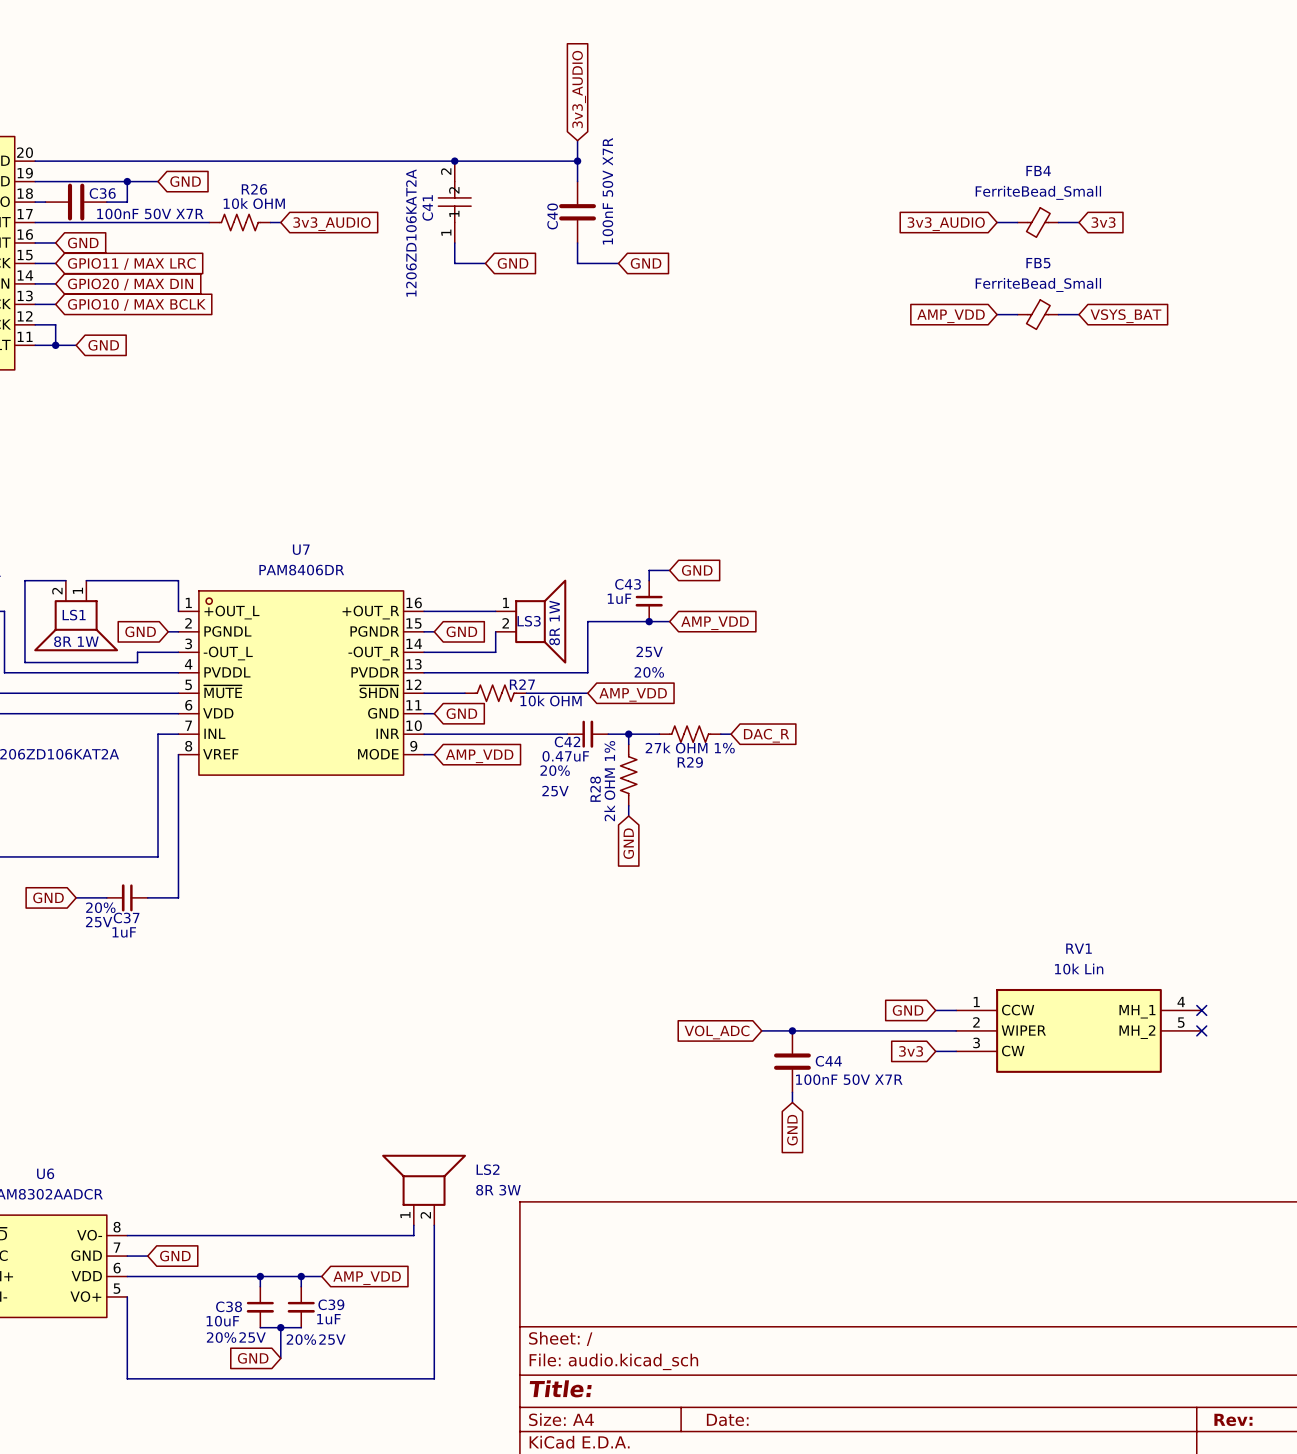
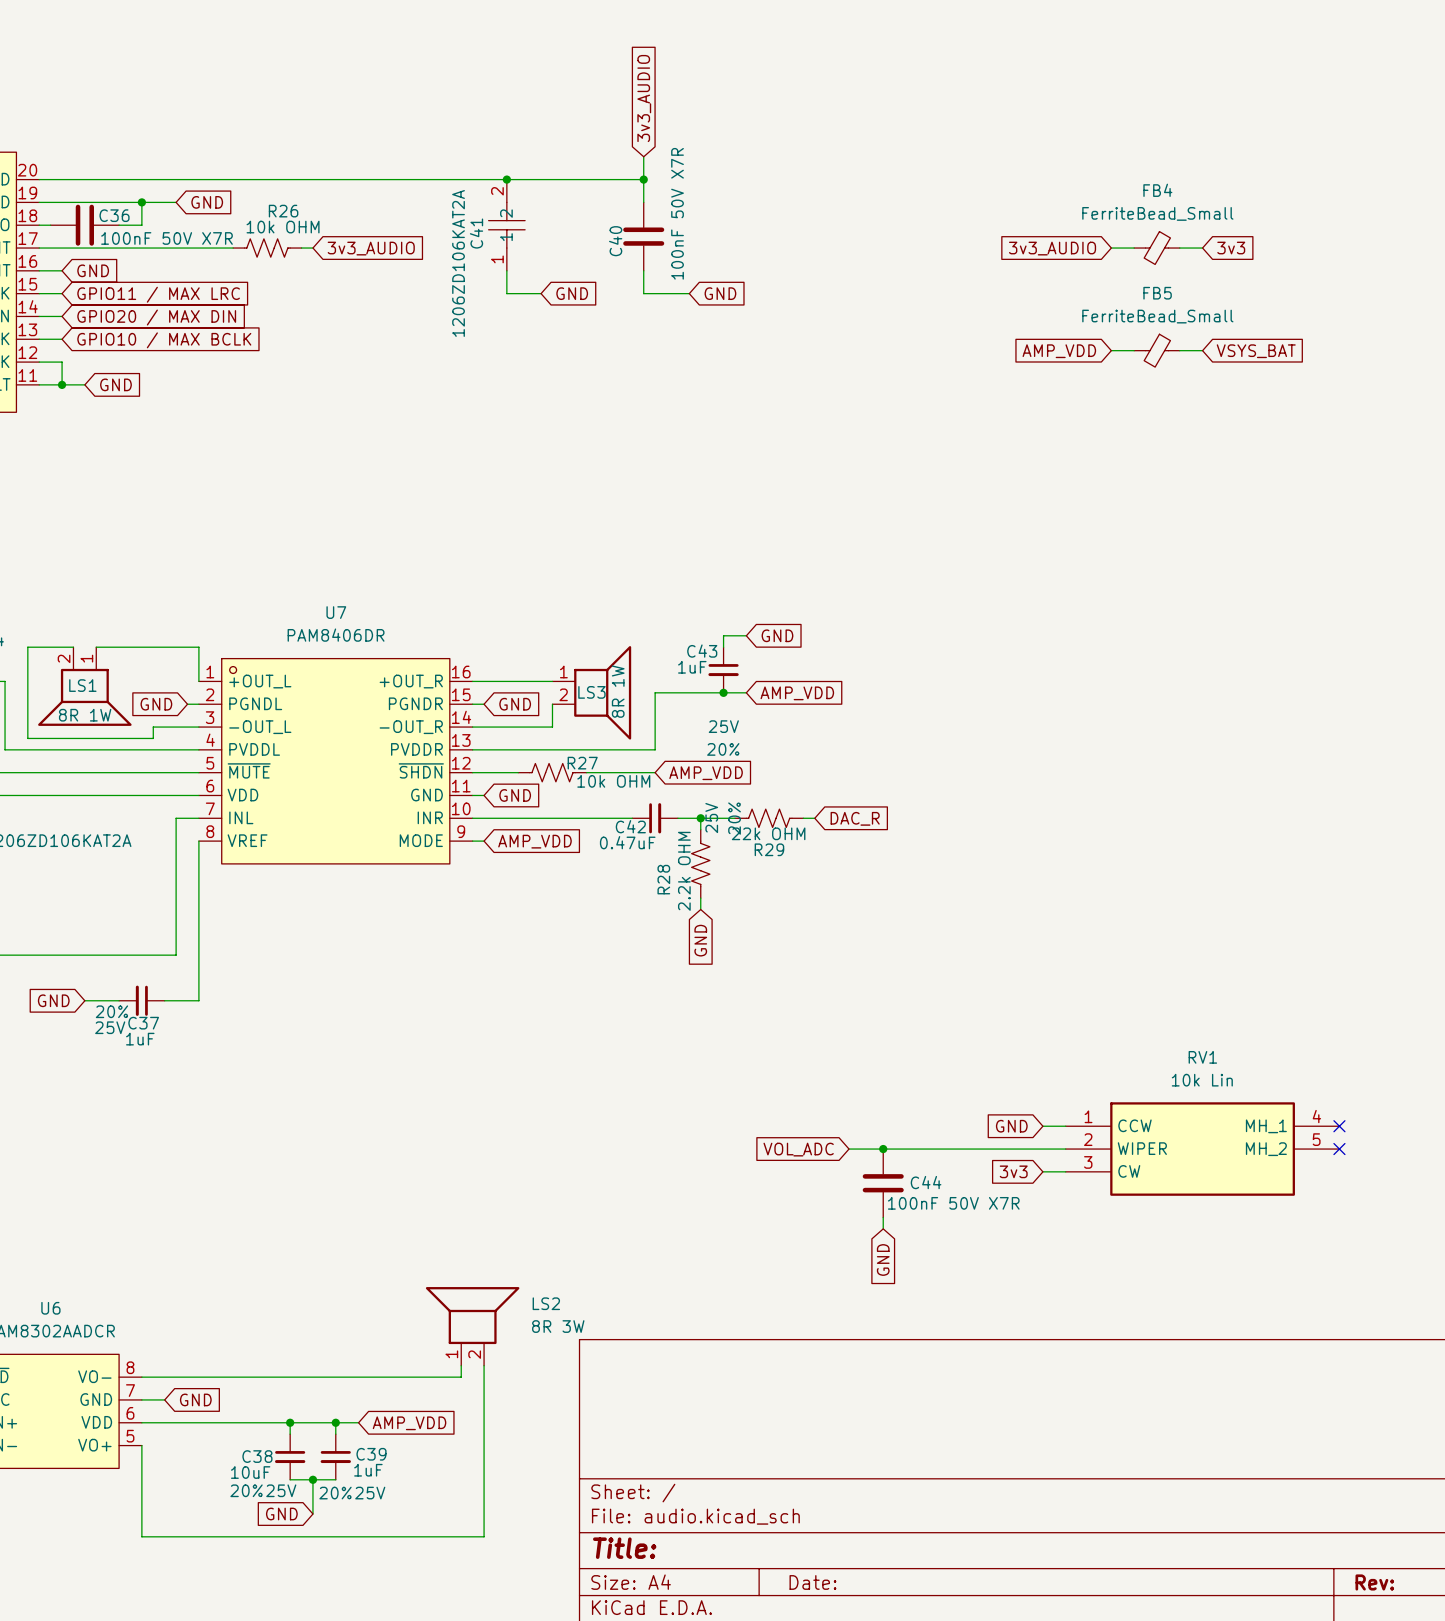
R29 value: 27k OHM 1% (690, 748) -> 22k OHM (768, 833)
C42 text rotation: 0° (555, 770) -> 90° counterclockwise (734, 818)
C42 text position: 20% (555, 770) -> 20% (734, 818)
R28 value: 2k OHM 1% (609, 781) -> 2.2k OHM (684, 871)
C42 text rotation: 0° (555, 791) -> 90° counterclockwise (711, 818)
C42 text position: 25V (555, 791) -> 25V (711, 818)

